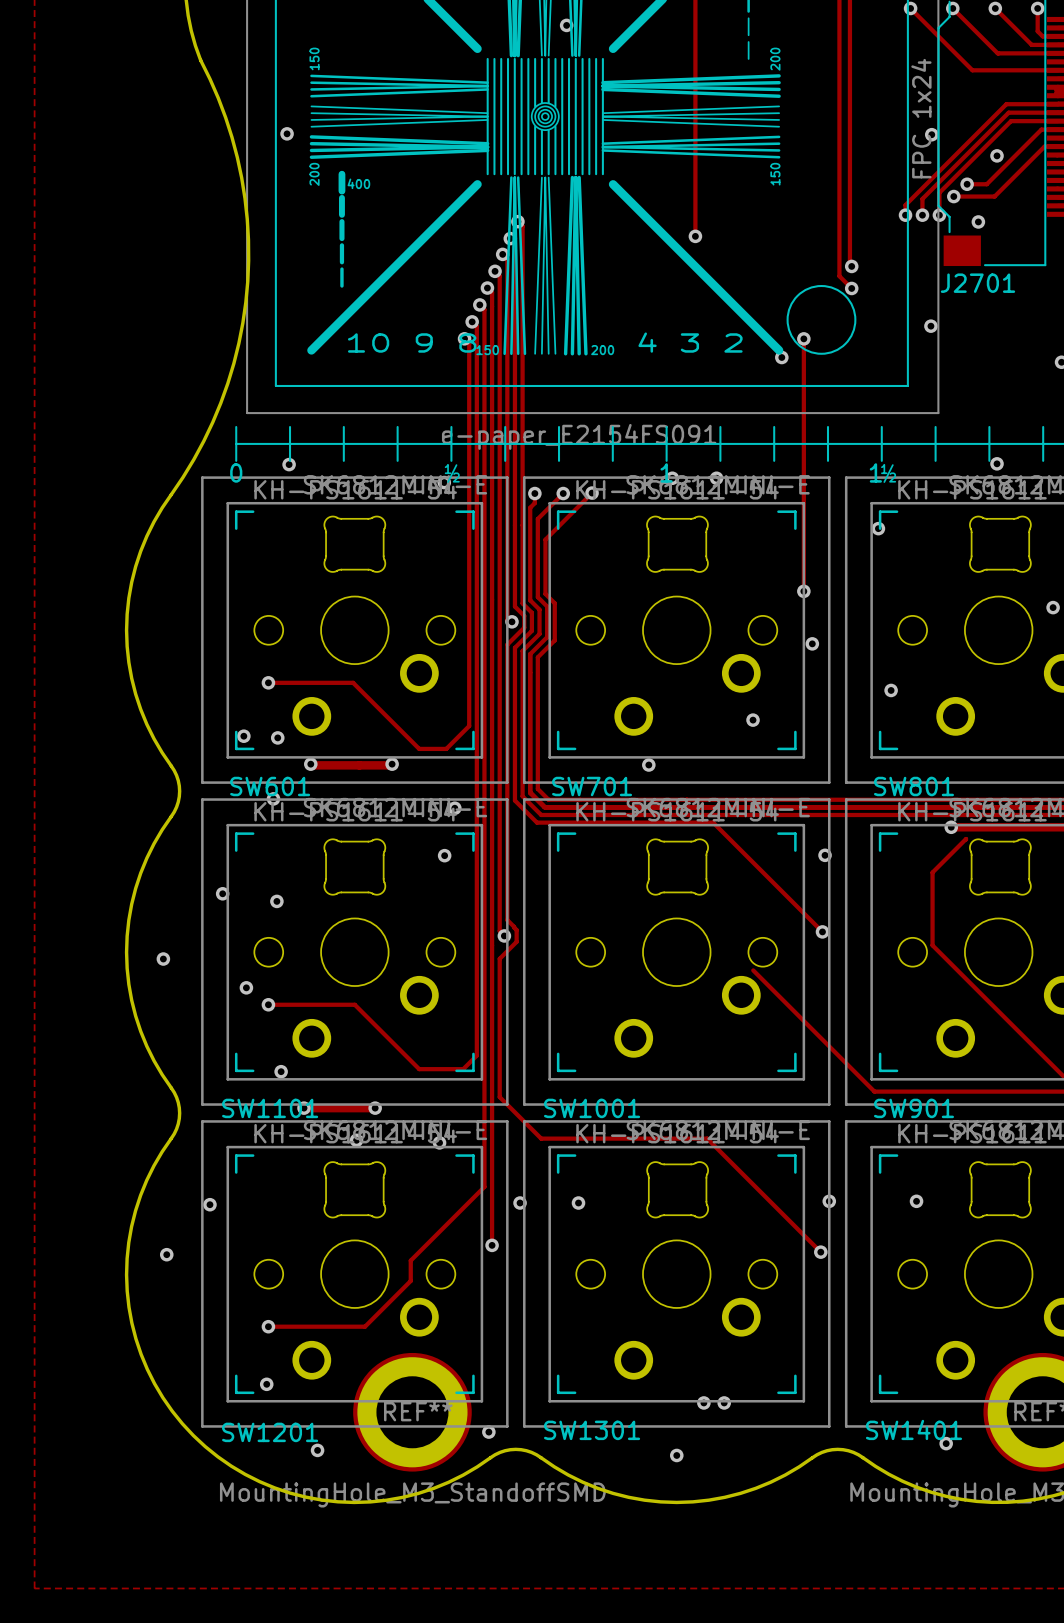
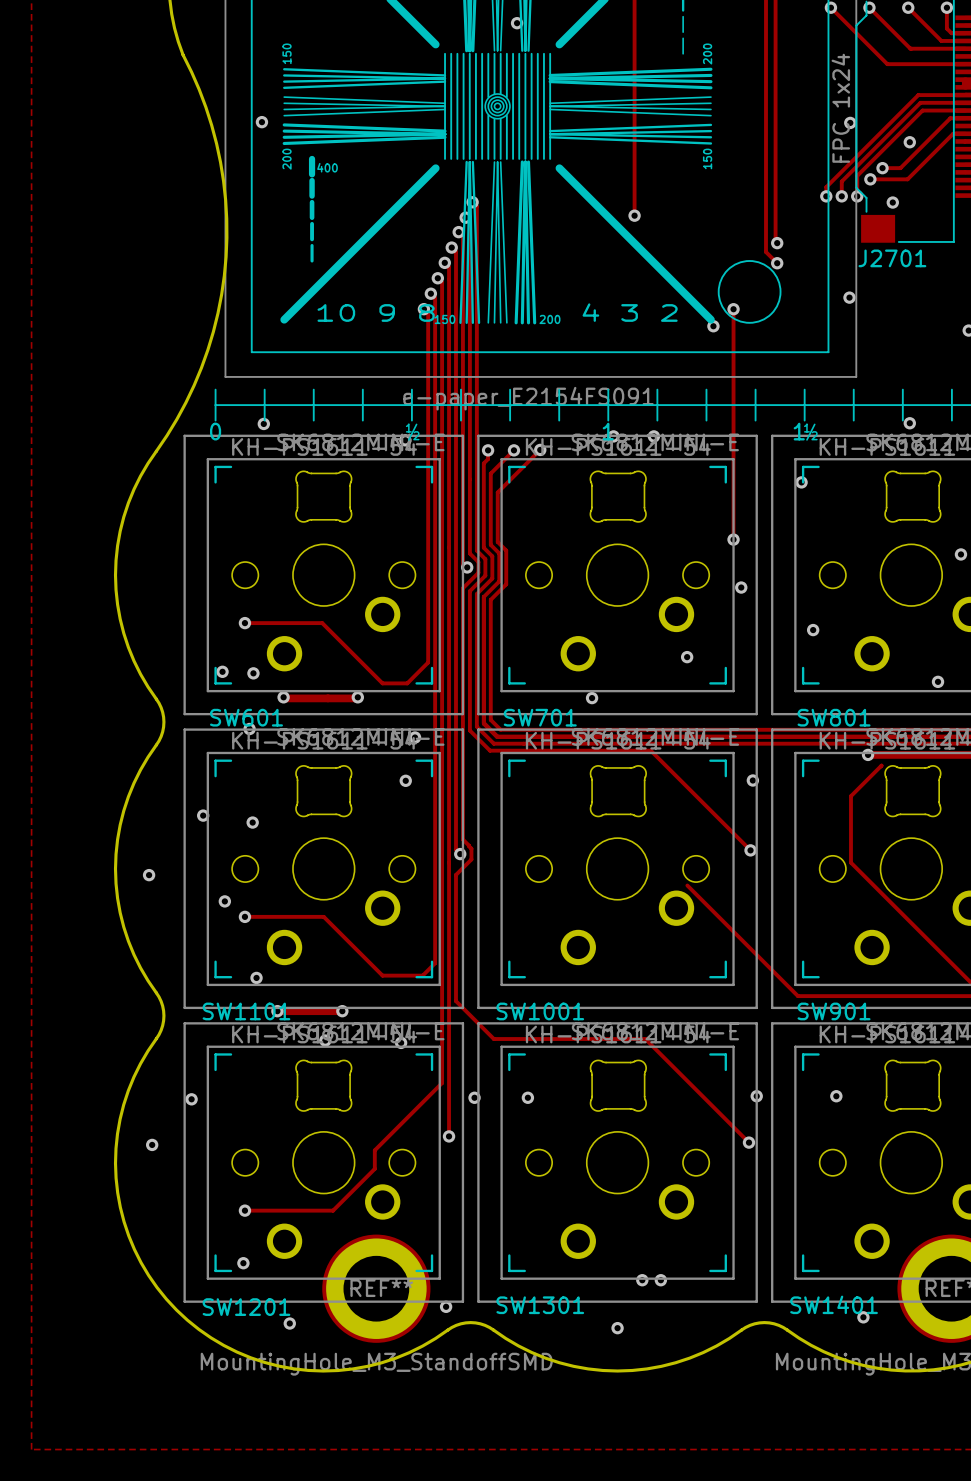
via: none -> (938, 681)

